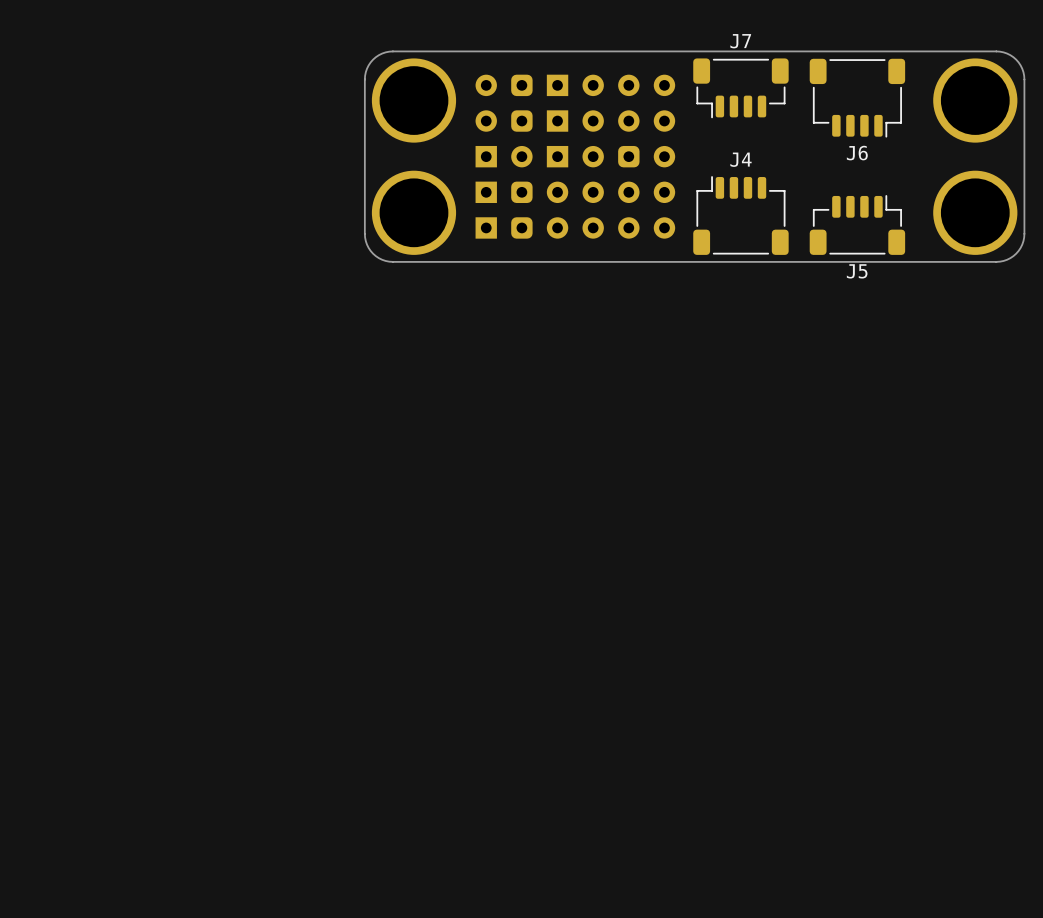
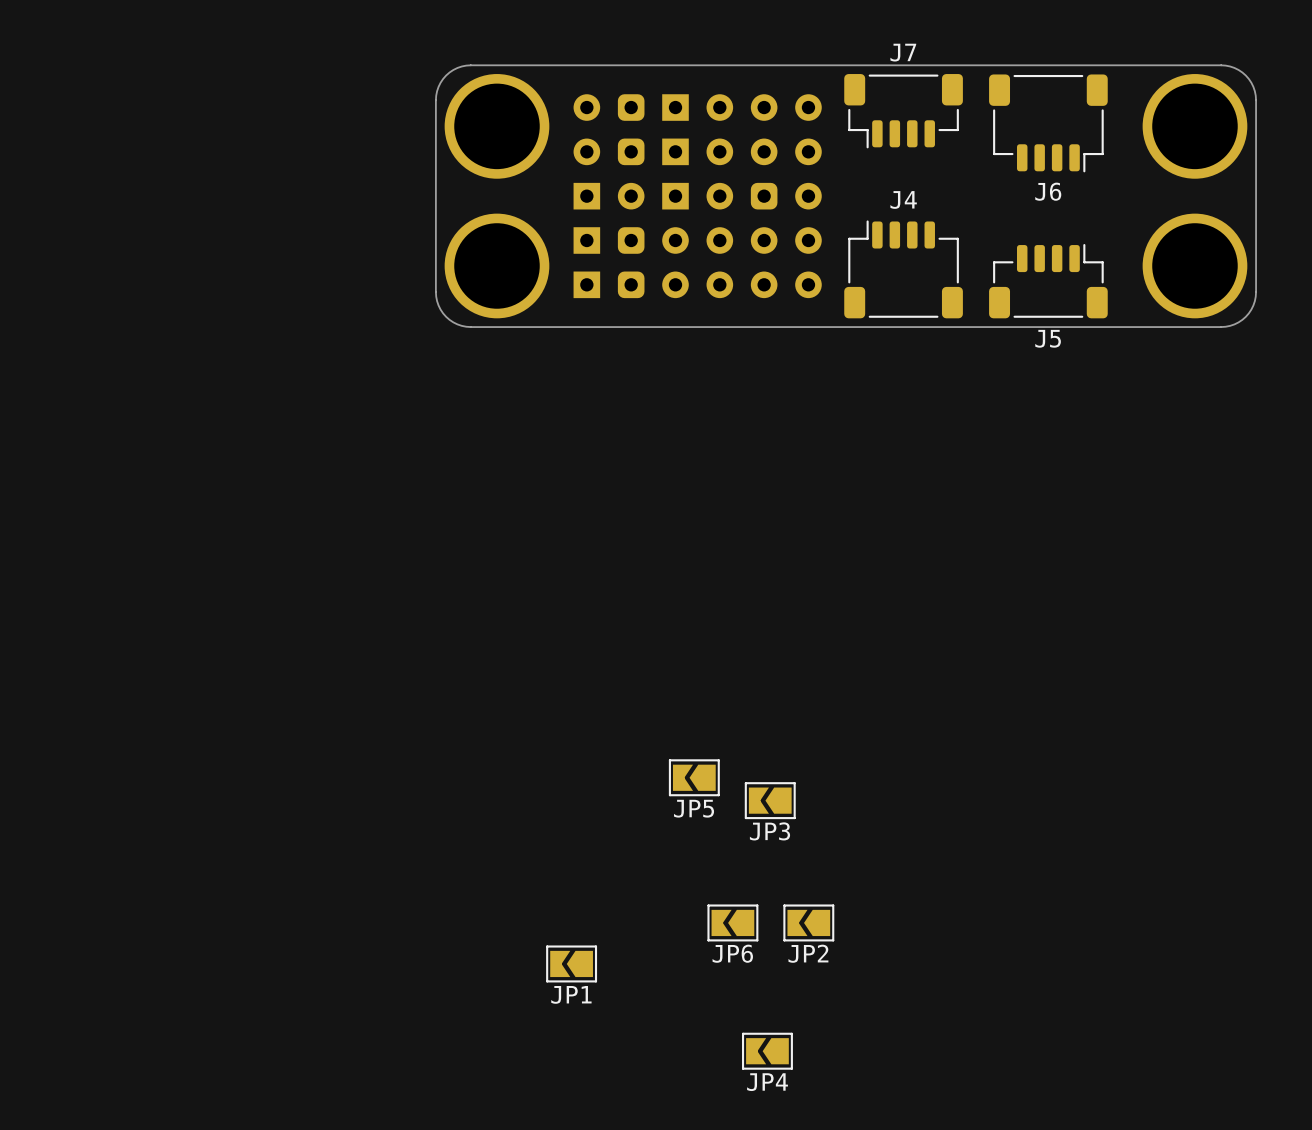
JP5: none -> (694, 777)
JP3: none -> (770, 800)
JP6: none -> (732, 922)
JP2: none -> (808, 922)
JP1: none -> (571, 963)
JP4: none -> (767, 1051)

